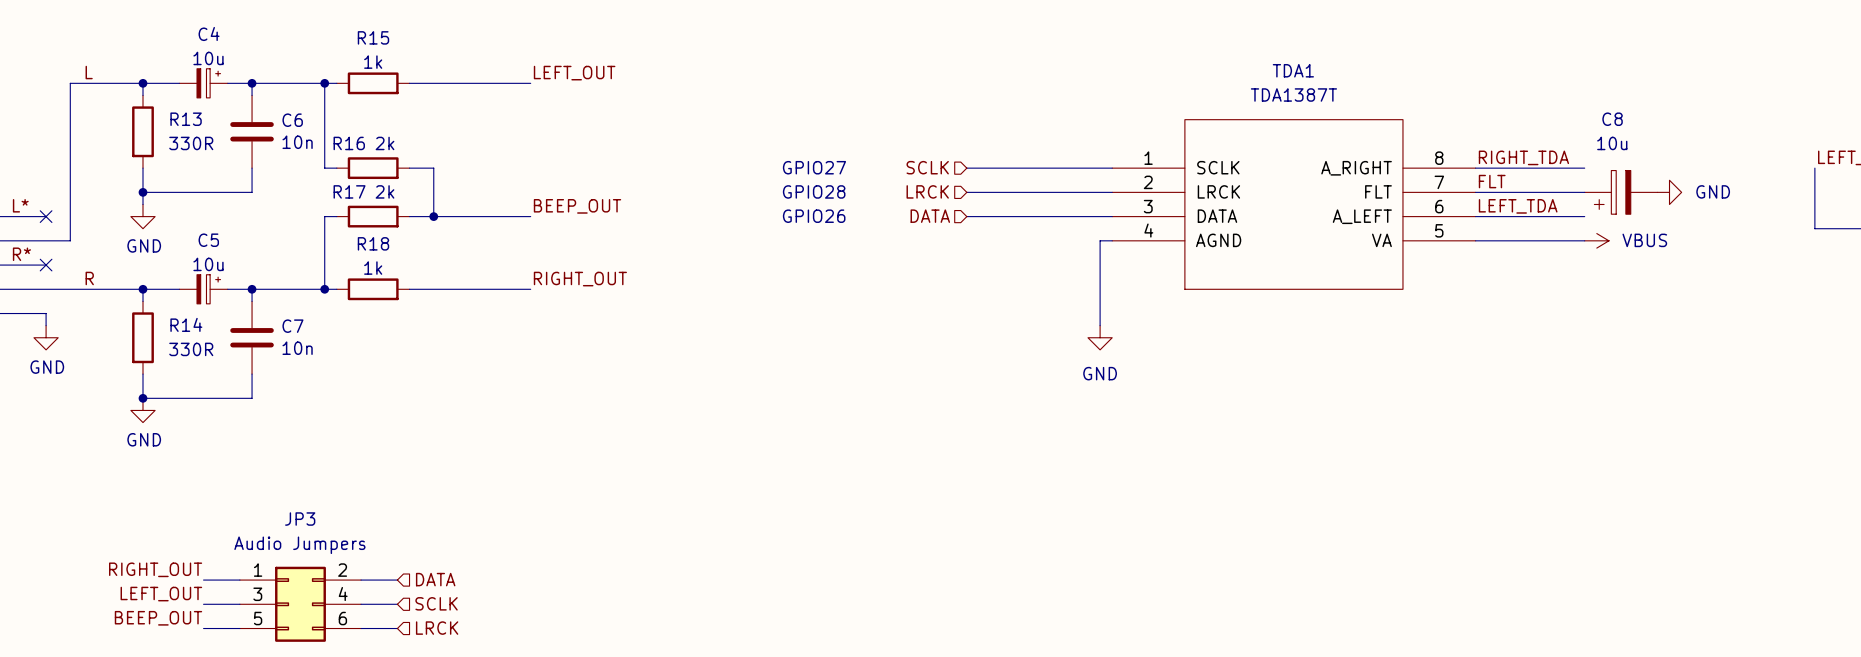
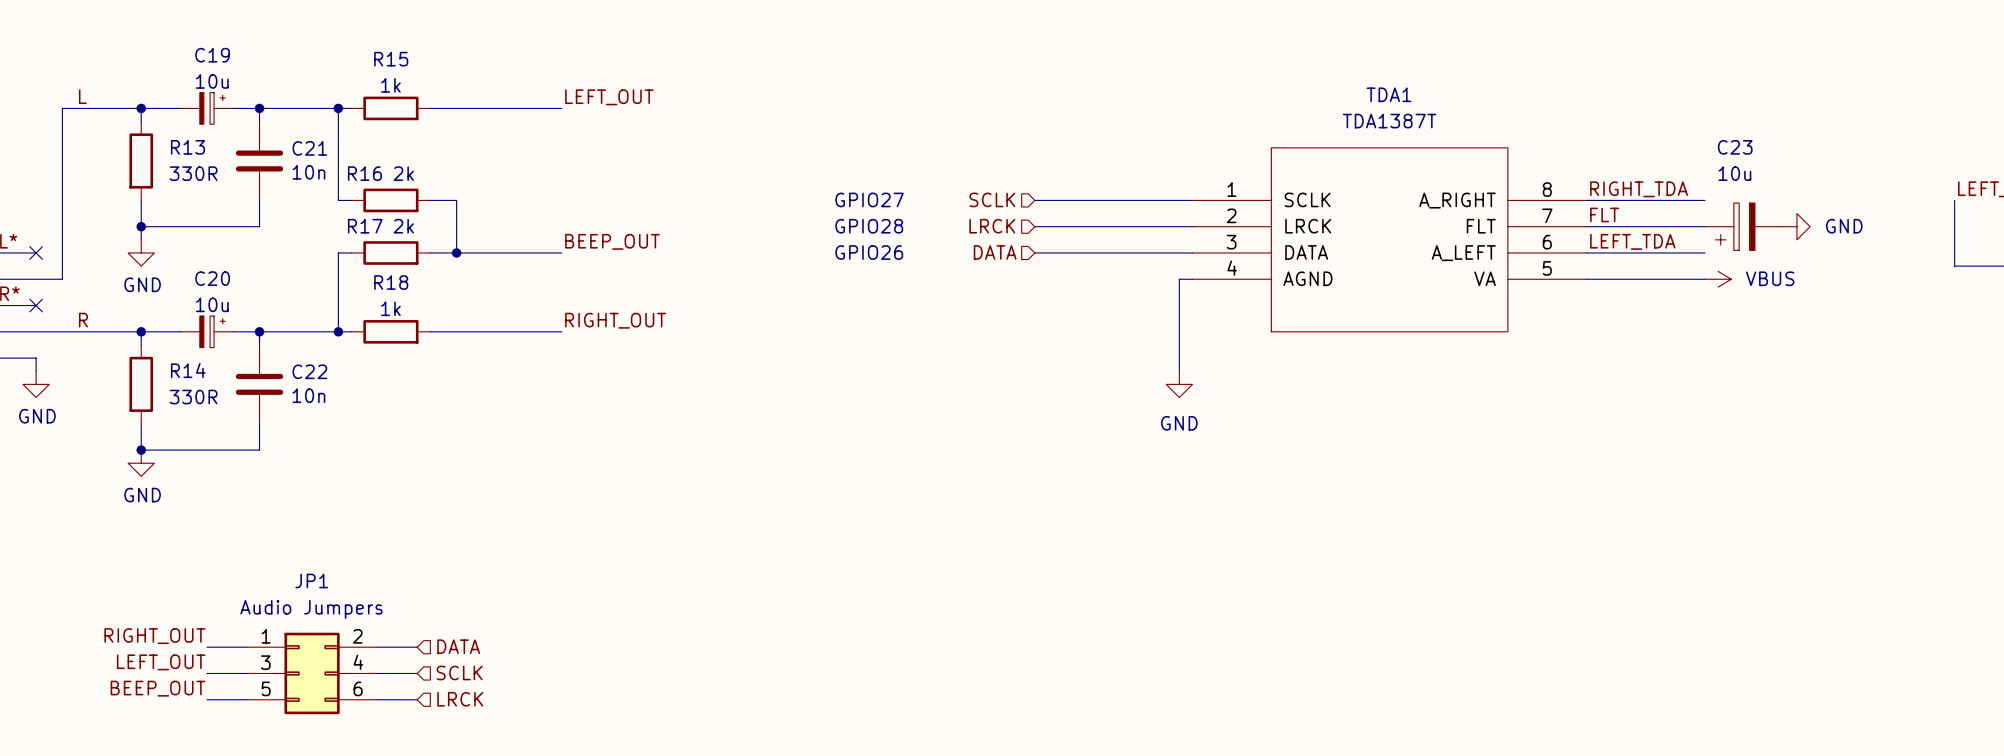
C4 name: C4 (209, 33) -> C19 (212, 55)
C8 name: C8 (1612, 119) -> C23 (1735, 147)
C6 name: C6 (292, 120) -> C21 (309, 148)
C5 name: C5 (208, 240) -> C20 (212, 278)
C7 name: C7 (292, 326) -> C22 (309, 371)
JP3 name: JP3 (300, 519) -> JP1 (311, 581)

